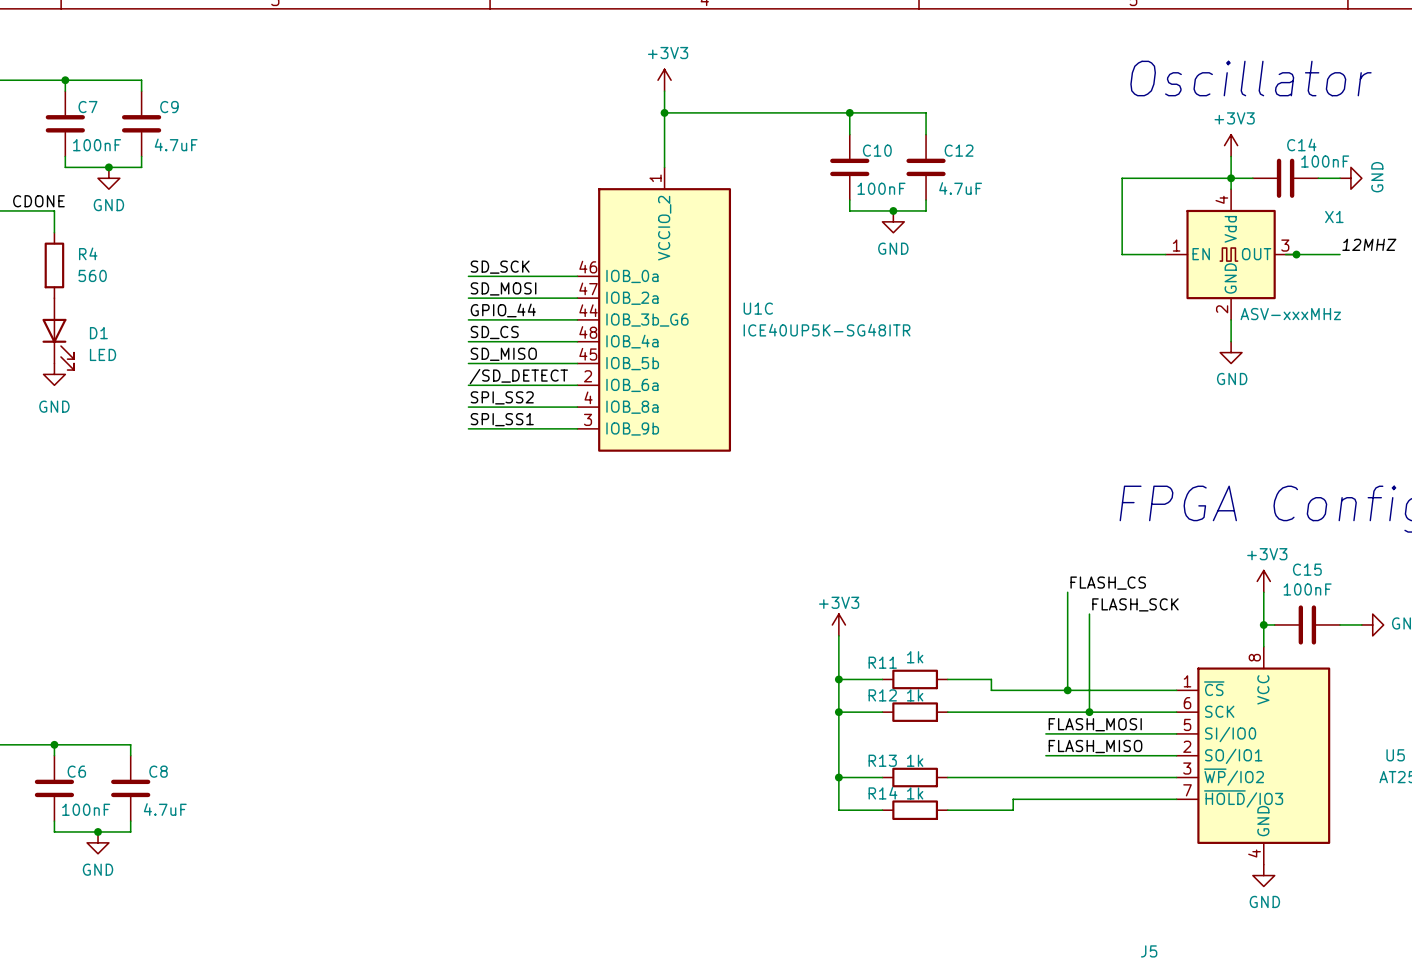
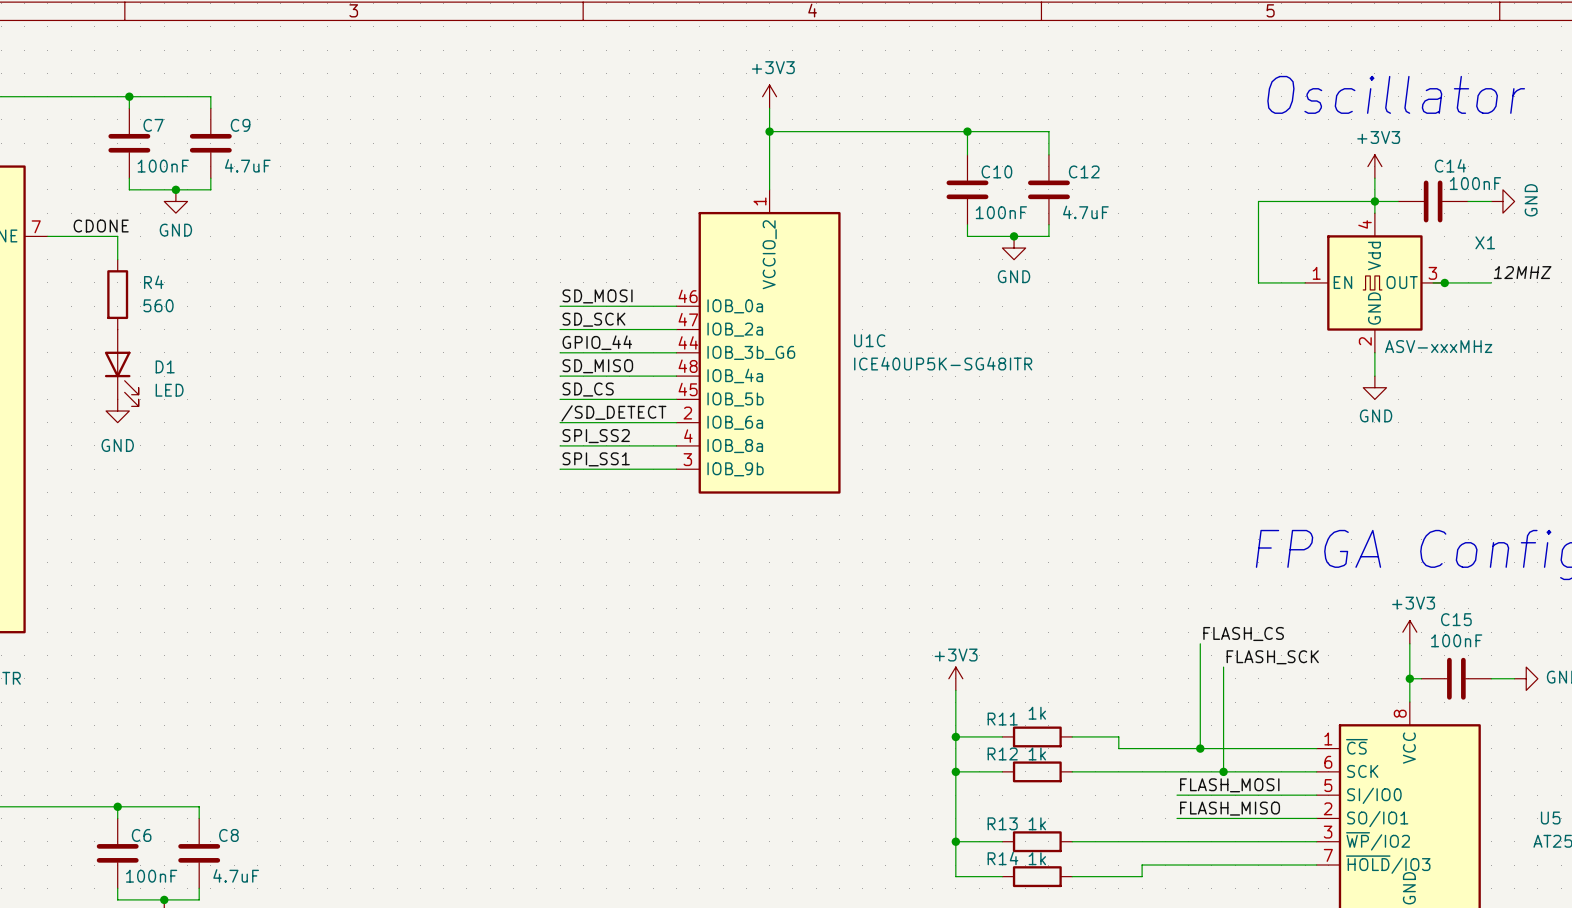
label: SD_SCK (500, 267) -> SD_MOSI (597, 296)
label: SD_MOSI (503, 288) -> SD_SCK (593, 319)
label: SD_CS (494, 332) -> SD_MISO (597, 366)
label: SD_MISO (503, 354) -> SD_CS (588, 389)

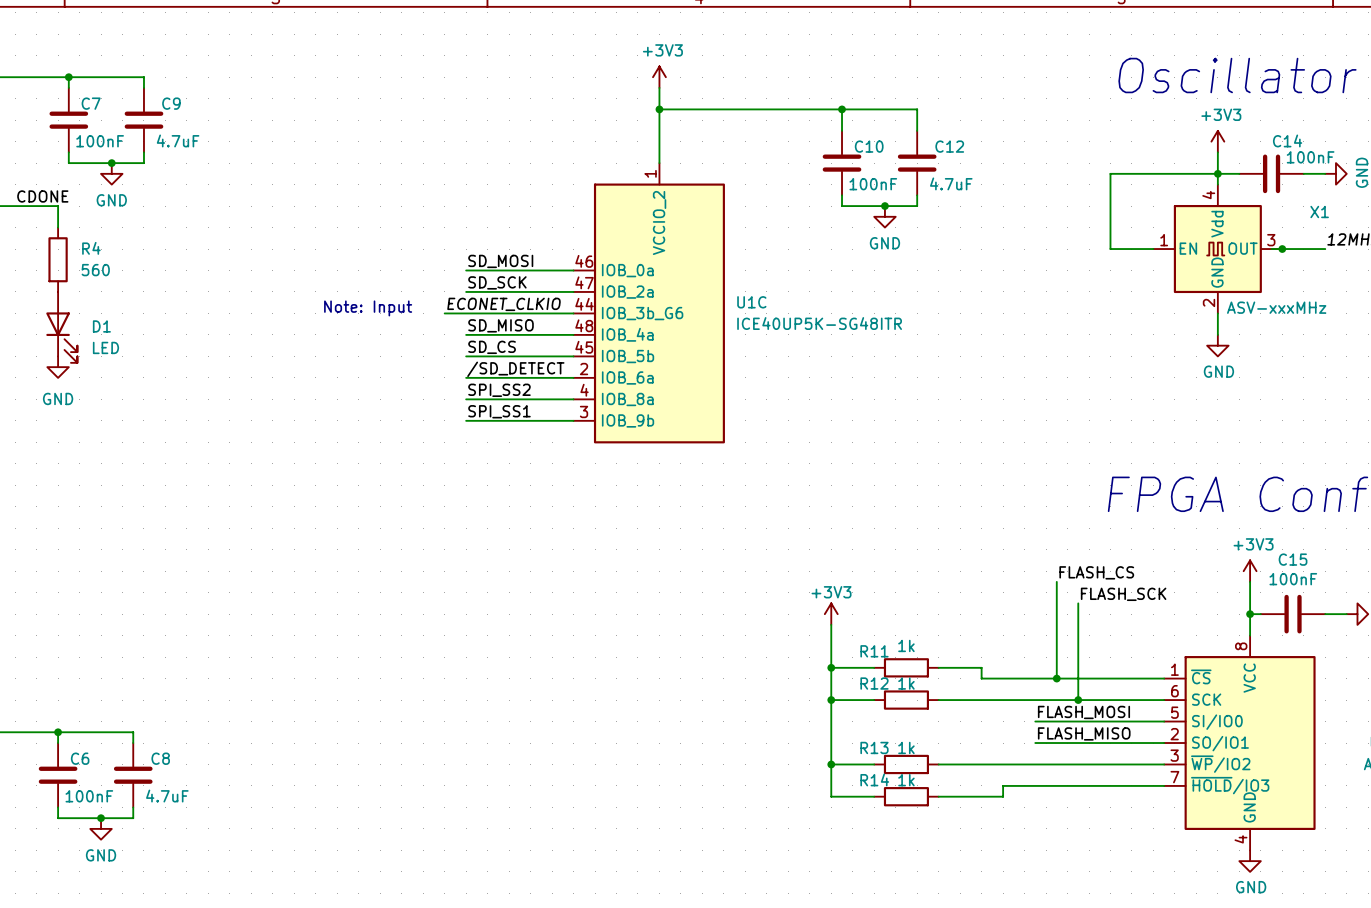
label: GPIO_44 (597, 342) -> none
label: none -> ECONET_CLKIO (504, 304)
text: none -> Note: Input (368, 308)
wire: none -> (444, 313) (466, 313)

